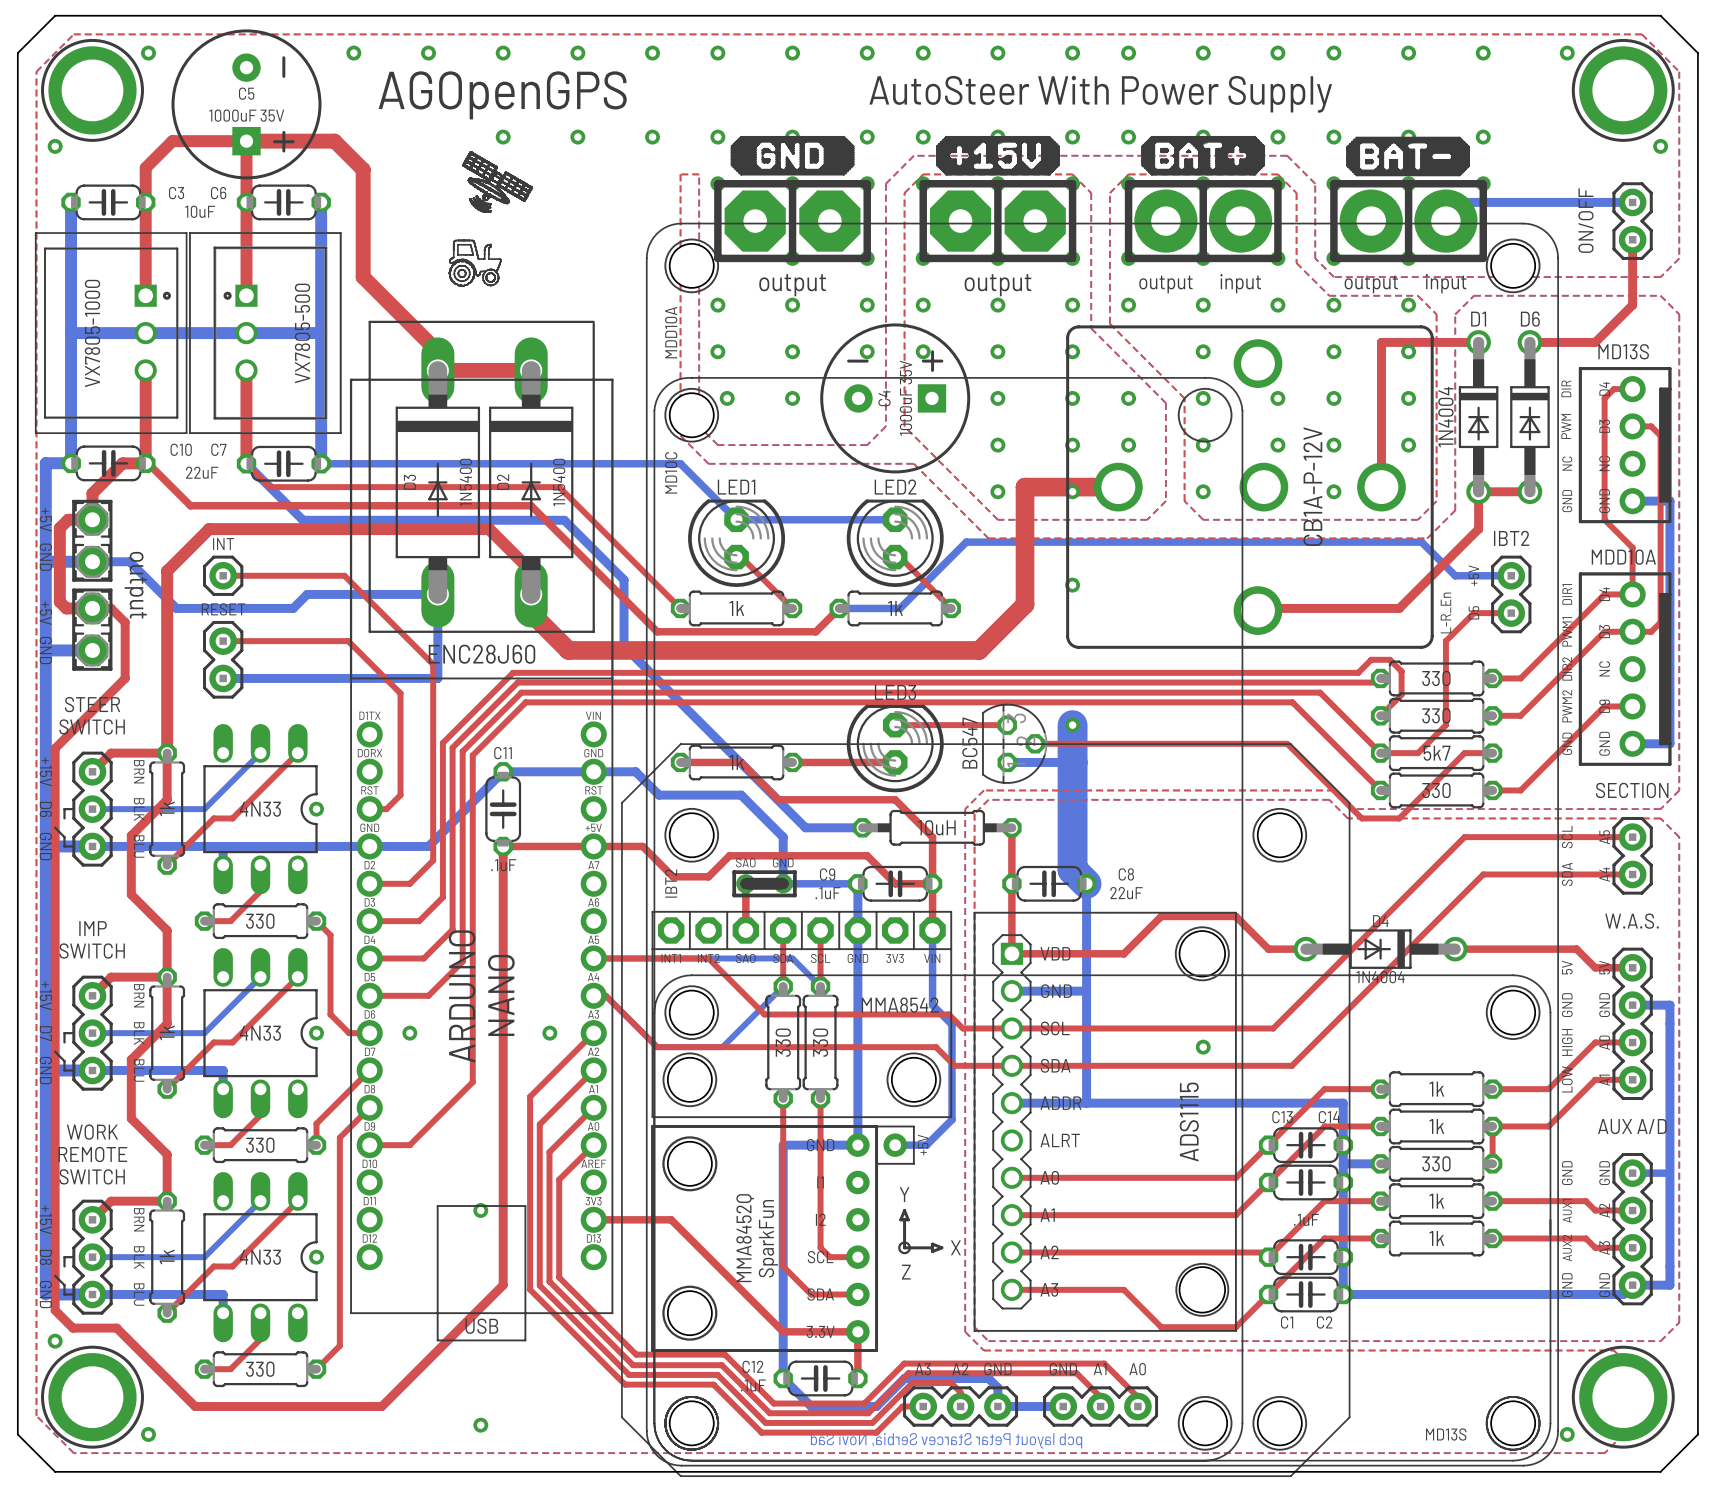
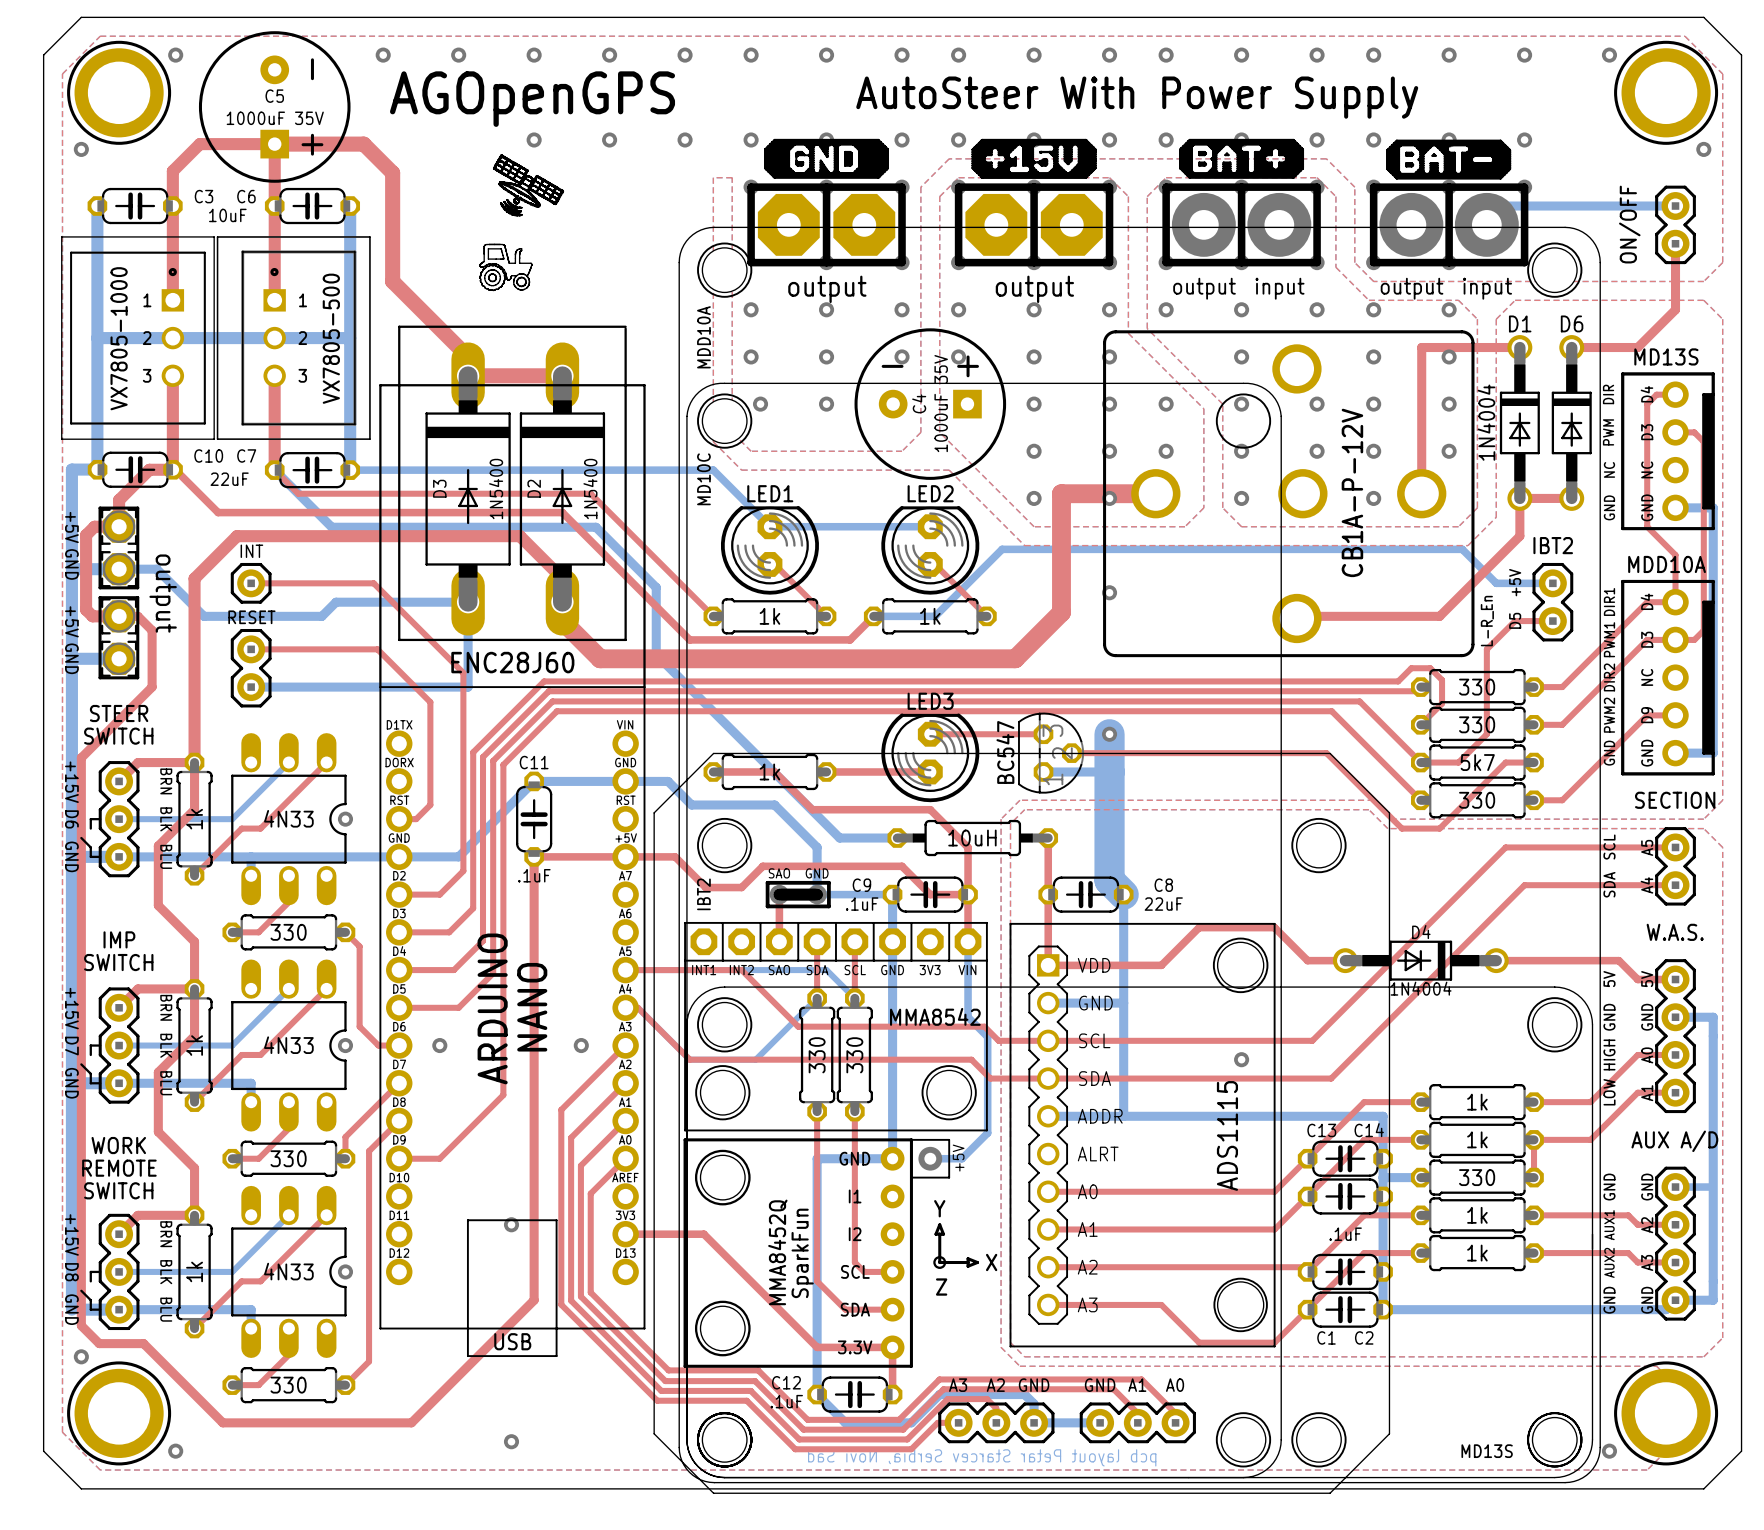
part footprint: [189, 232, 342, 434] -> [216, 236, 371, 440]
part footprint: [44, 247, 179, 419] -> [70, 251, 206, 425]

